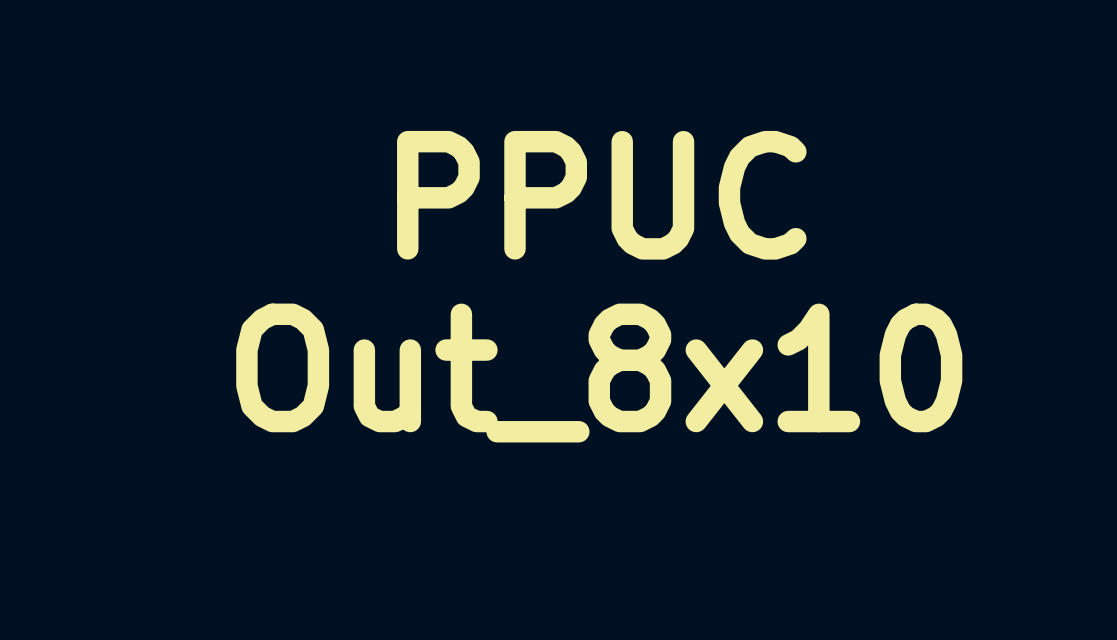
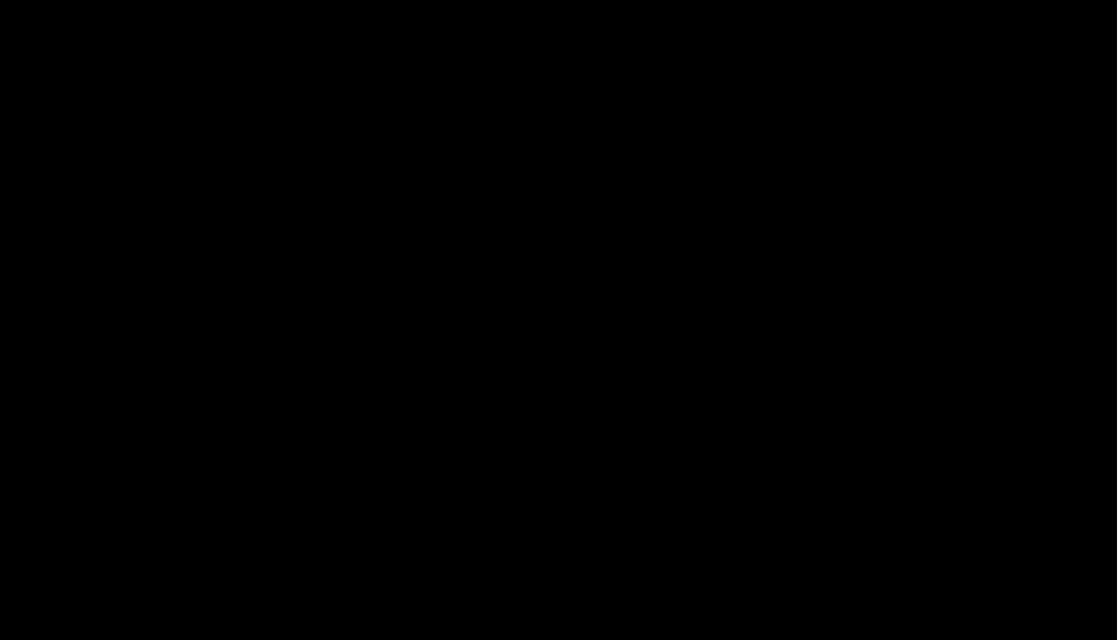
text: PPUC (601, 195) -> none
text: Out_8x10 (599, 373) -> none

